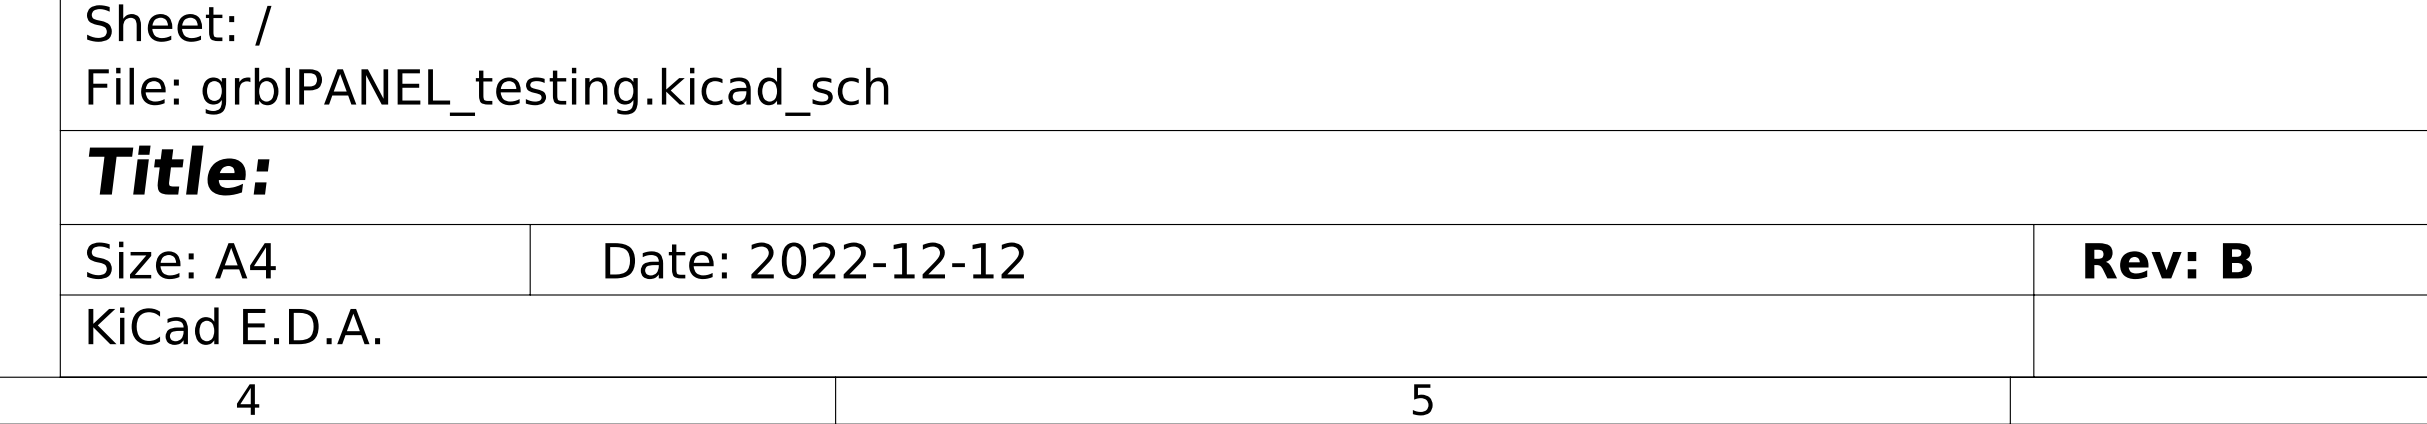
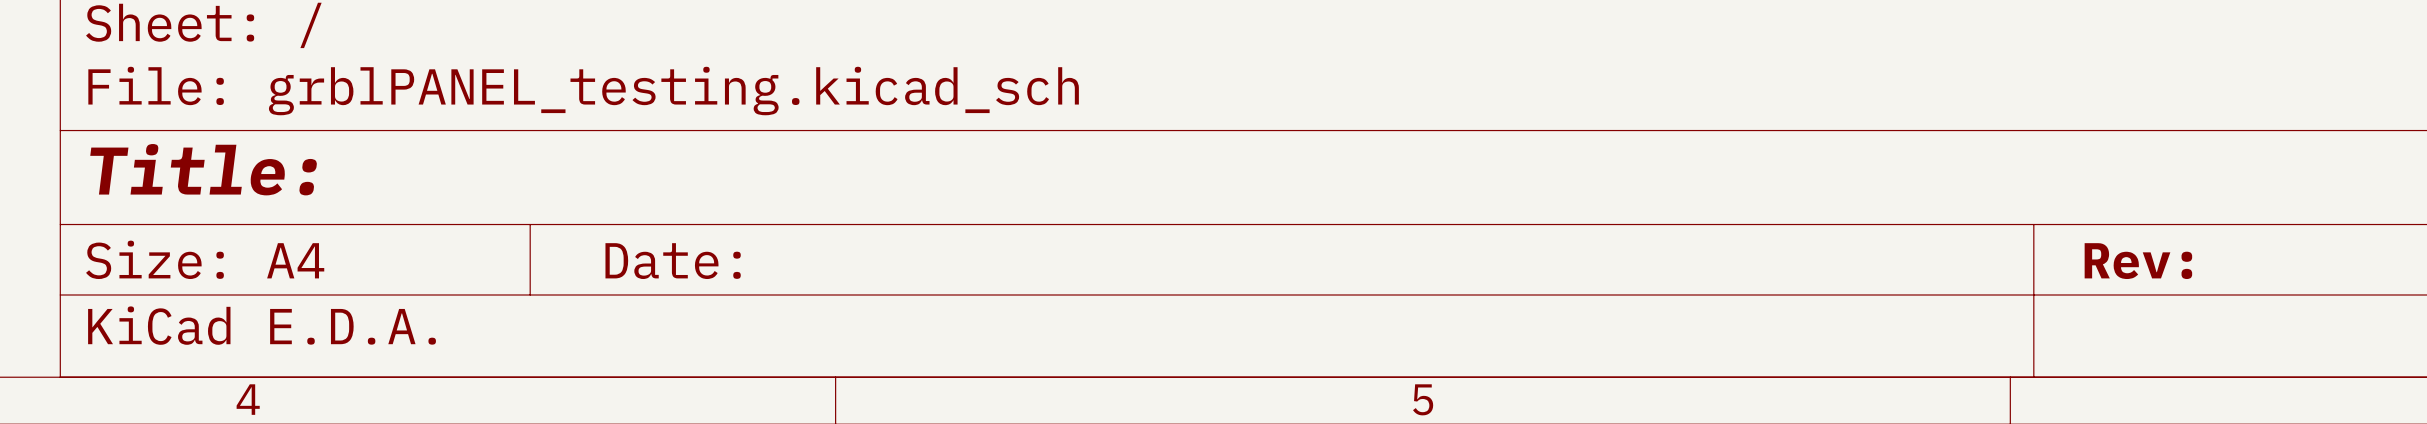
title block: Date: 2022-12-12 (814, 260) -> Date: (673, 261)
title block: Rev: B (2168, 261) -> Rev: (2138, 261)

